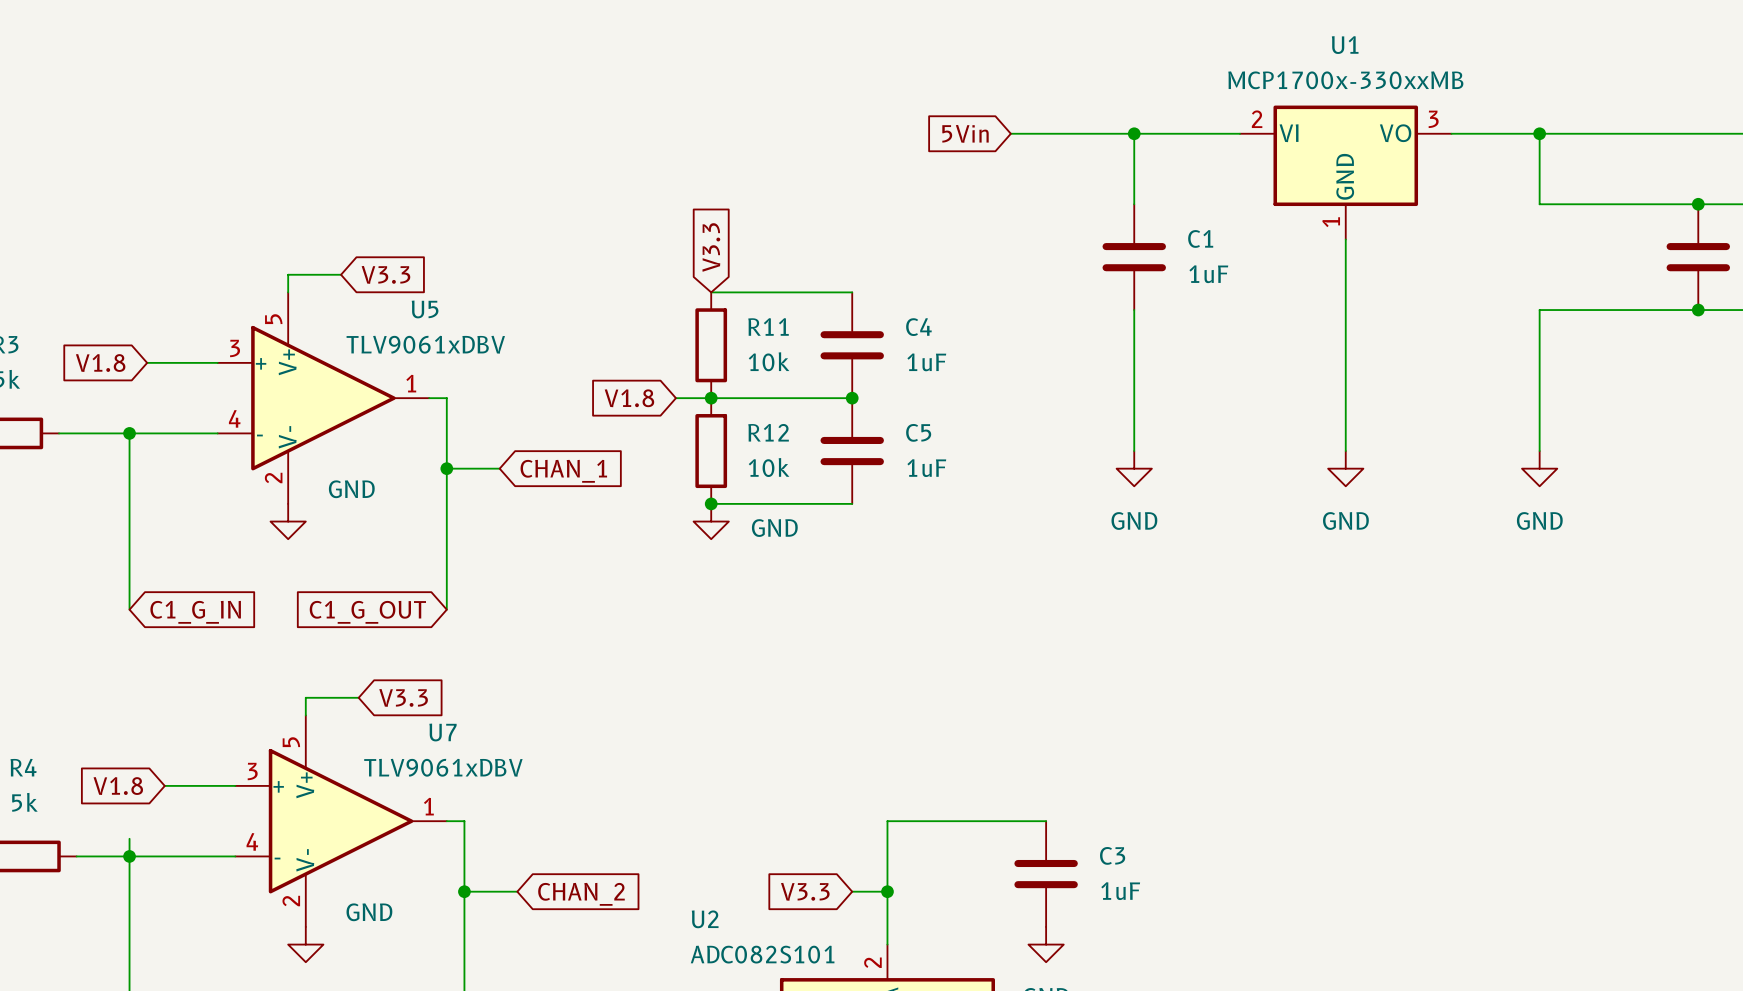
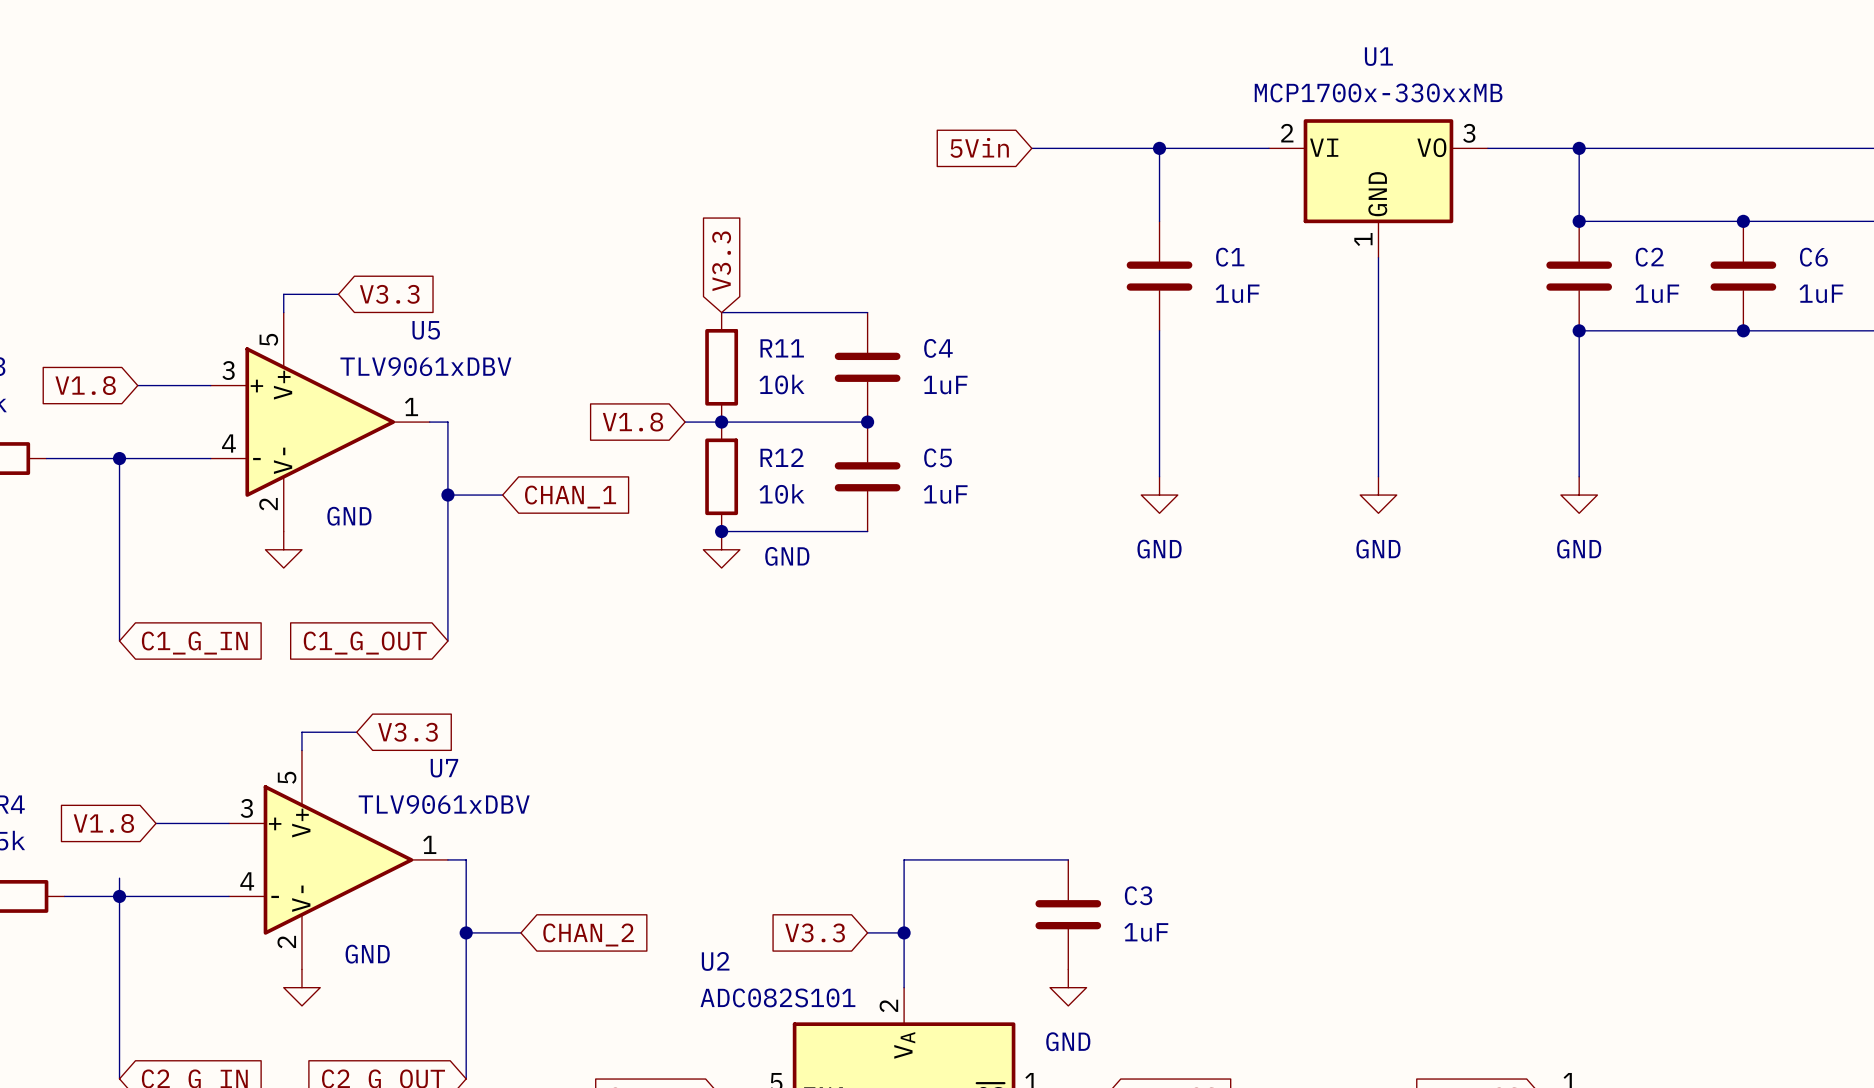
junction: none -> (1579, 221)
C2: none -> 1uF (1579, 276)
junction: none -> (1579, 330)

